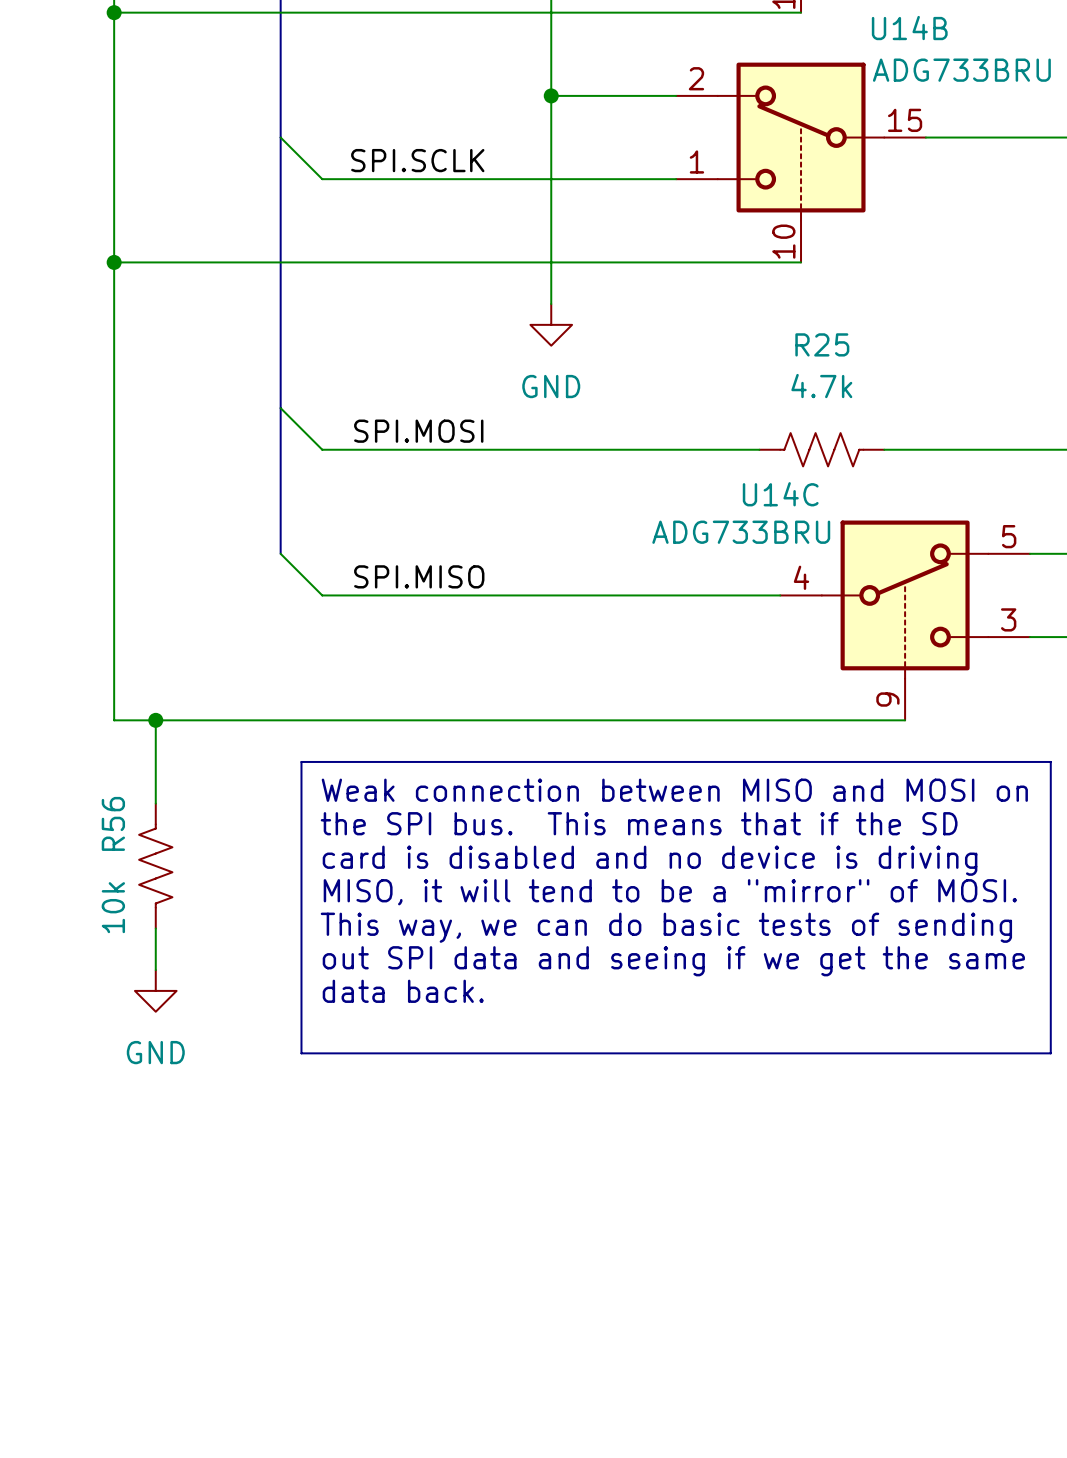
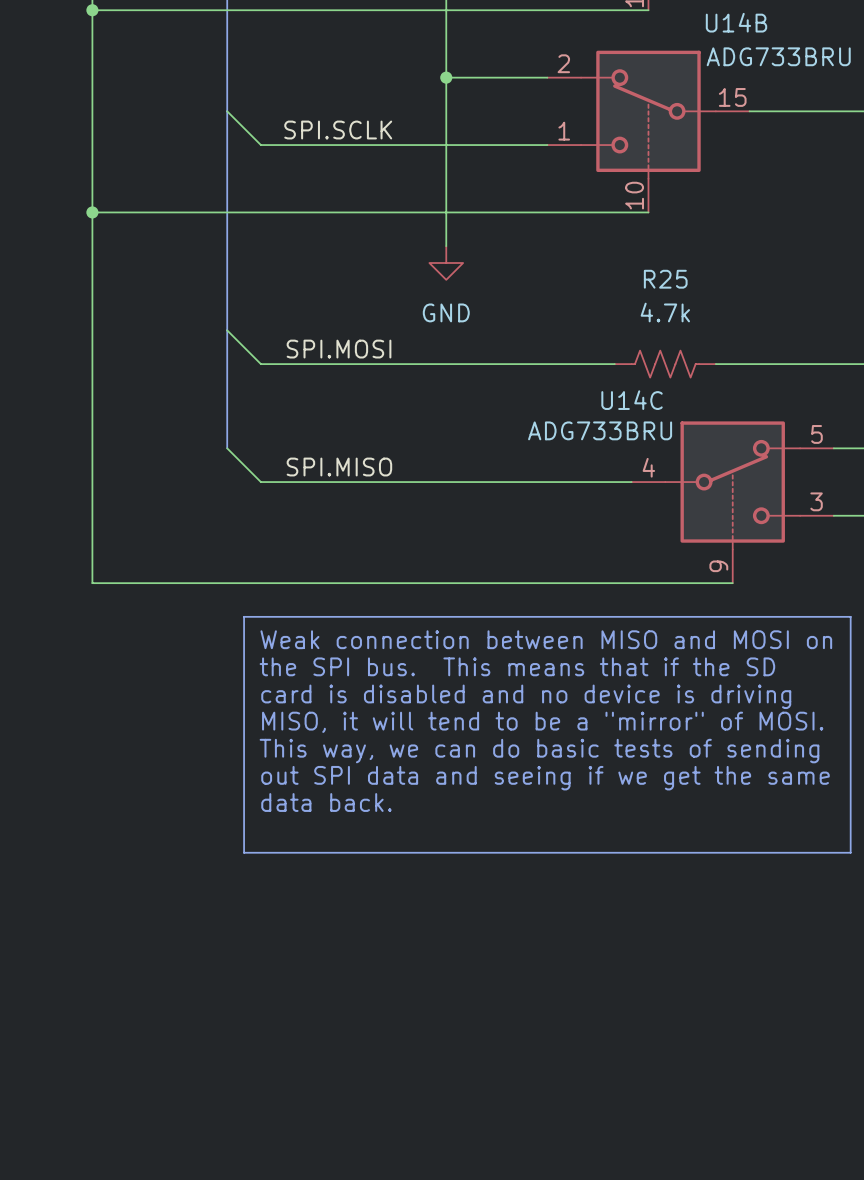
wire: (155, 720) (155, 803) -> none
junction: (155, 720) -> none
R56: 10k (155, 866) -> none
wire: (155, 928) (155, 970) -> none
power symbol: GND (155, 990) -> none

